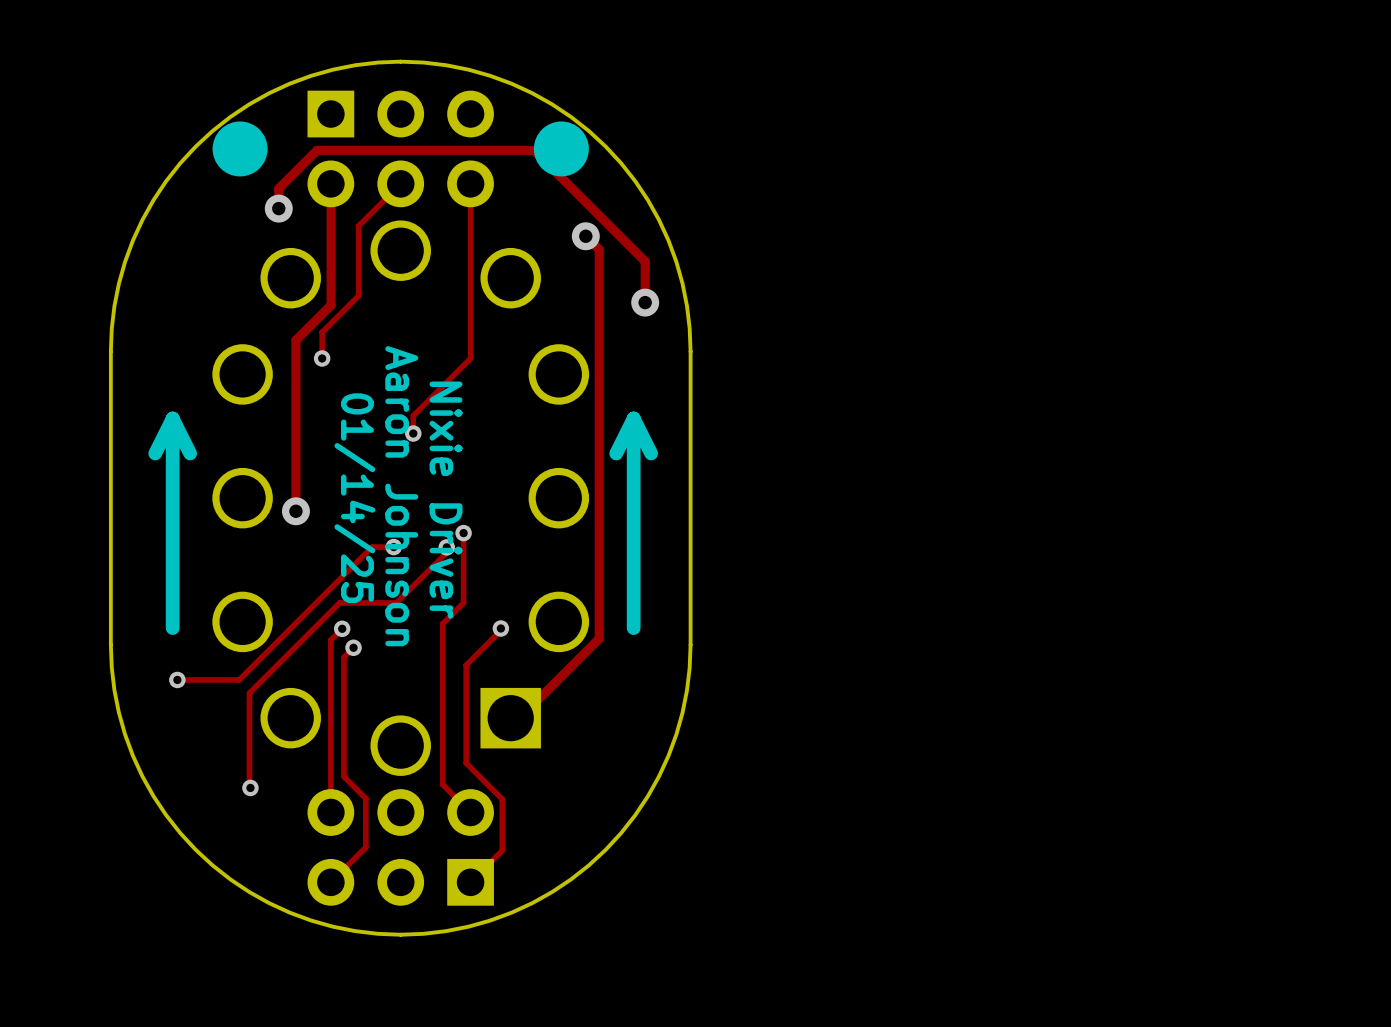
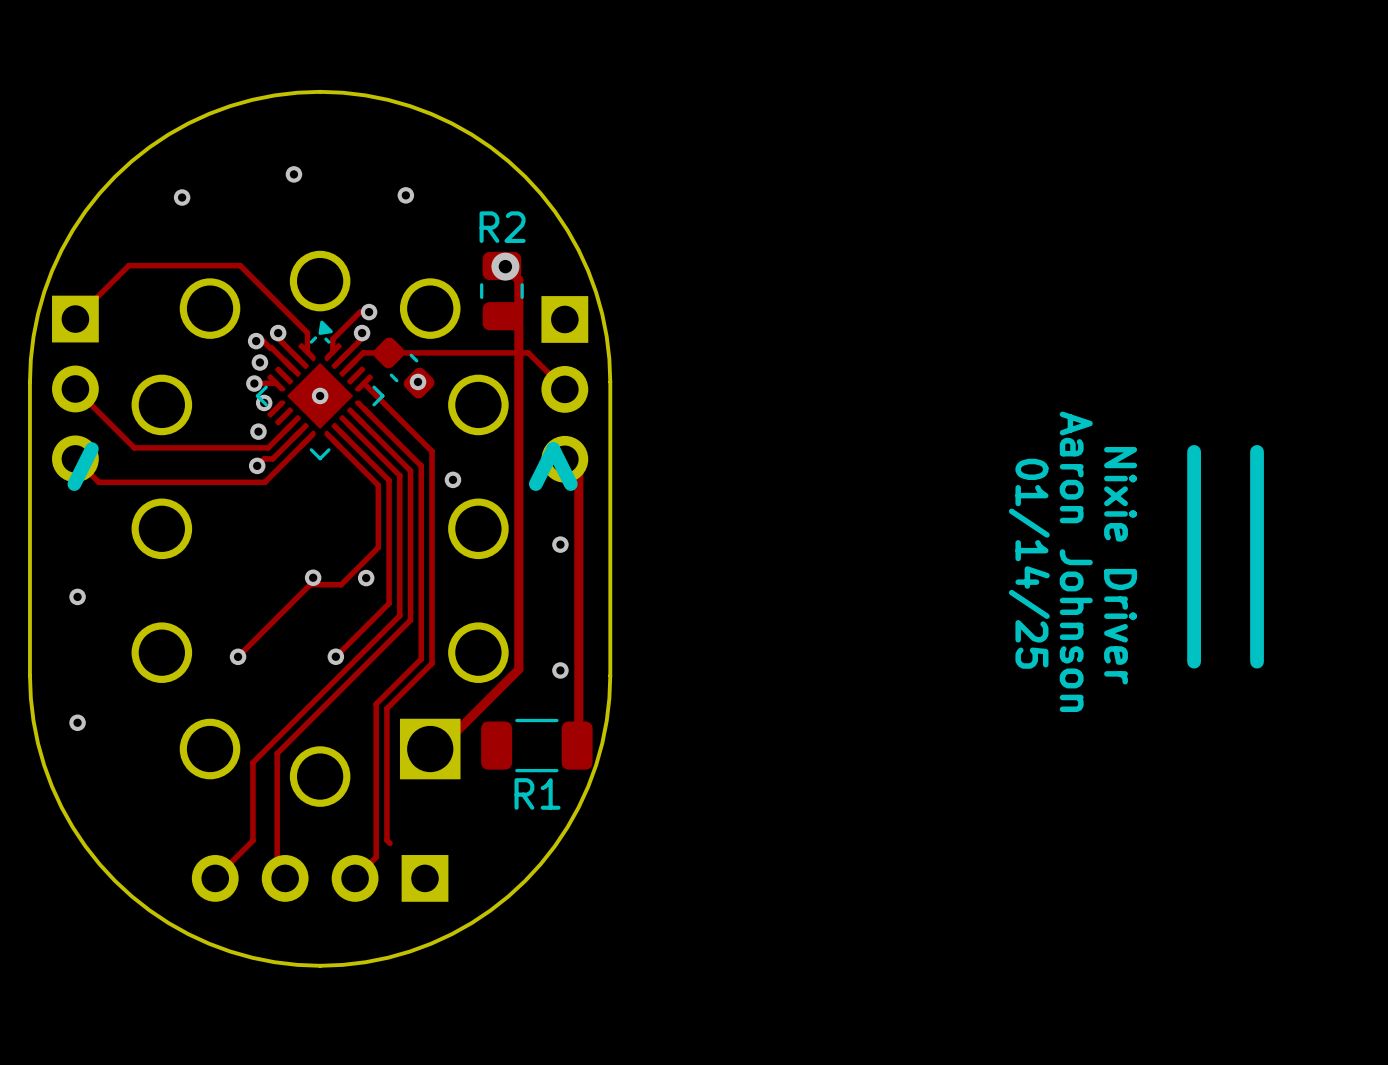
drawing: [212, 121, 268, 177] -> none
drawing: [533, 121, 589, 177] -> none
via: none -> (293, 174)
part: (400, 148) -> none
via: none -> (405, 195)
via: none -> (182, 197)
track: (400, 183) (358, 225) (358, 295) (322, 332) (322, 358) -> none
track: (470, 183) (470, 358) (413, 415) (413, 433) -> none
track: (331, 184) (331, 305) (295, 340) (295, 511) -> none
track: (278, 208) (278, 188) (317, 150) (534, 150) (645, 261) (645, 302) -> none
via: (278, 208) -> none
R2: none -> (501, 291)
track: none -> (369, 312) (360, 312) (332, 339) (332, 352)
via: none -> (369, 312)
track: none -> (75, 319) (128, 265) (240, 265) (307, 332) (307, 352)
track: none -> (278, 333) (278, 338) (299, 359)
via: none -> (278, 333)
track: none -> (362, 333) (362, 338) (340, 359)
via: none -> (362, 333)
via: (645, 302) -> none
track: none -> (256, 341) (263, 341) (291, 367)
via: none -> (256, 341)
via: none -> (259, 362)
track: none -> (348, 367) (363, 352) (528, 352) (564, 389)
part: none -> (404, 368)
via: none -> (418, 381)
track: none -> (254, 383) (276, 383)
track: none -> (75, 388) (134, 447) (268, 447) (291, 424)
part: none -> (75, 388)
via position: (322, 358) -> (254, 383)
part: none -> (564, 389)
part: none -> (320, 390)
via: none -> (320, 395)
via: none -> (264, 402)
track: none -> (363, 408) (421, 465) (421, 659) (376, 704) (376, 857) (355, 878)
track: none -> (356, 416) (410, 470) (410, 620) (277, 753) (277, 870) (285, 878)
track: none -> (348, 424) (399, 475) (399, 615) (252, 762) (252, 840) (215, 878)
via: none -> (258, 431)
track: none -> (299, 431) (272, 458) (264, 458) (257, 465)
track: none -> (340, 431) (389, 480) (389, 603) (335, 656)
track: none -> (307, 439) (264, 482) (98, 482) (75, 458)
track: none -> (332, 439) (378, 485) (378, 547) (341, 584) (310, 584) (238, 656)
line: (633, 418) (633, 628) -> (1194, 451) (1194, 661)
line: none -> (1257, 451) (1257, 661)
track: none -> (564, 459) (578, 473) (578, 743) (577, 745)
via: (413, 433) -> none
via: none -> (257, 465)
via: none -> (452, 479)
line: (190, 453) (172, 418) (172, 628) -> none
text: Aaron Johnson (401, 496) -> none
text: 01/14/25 (354, 498) -> none
text: Nixie Driver (446, 500) -> none
via: (295, 511) -> none
via: none -> (560, 544)
text: none -> Aaron Johnson (1076, 561)
track: (463, 533) (463, 602) (442, 623) (442, 784) (467, 809) -> (363, 383) (431, 451) (431, 663) (386, 708) (386, 840)
via: (463, 533) -> none
text: none -> 01/14/25 (1029, 563)
text: none -> Nixie Driver (1120, 565)
track: (393, 547) (372, 547) (239, 679) (176, 680) -> none
track: (446, 547) (446, 552) (396, 602) (339, 602) (249, 693) (249, 785) (251, 786) -> none
via: none -> (77, 596)
via: none -> (335, 656)
via: none -> (238, 656)
track: (342, 628) (330, 640) (330, 812) -> none
via: (342, 628) -> none
track: (500, 628) (466, 665) (466, 763) (502, 799) (502, 850) (470, 882) -> none
via: (500, 628) -> none
via: none -> (560, 670)
track: (353, 647) (343, 657) (343, 776) (365, 798) (365, 847) (330, 882) -> none
via: (353, 647) -> none
via position: (177, 679) -> (77, 722)
R1: none -> (536, 745)
via: (250, 787) -> none
part footprint: [307, 789, 494, 906] -> [191, 855, 449, 902]

